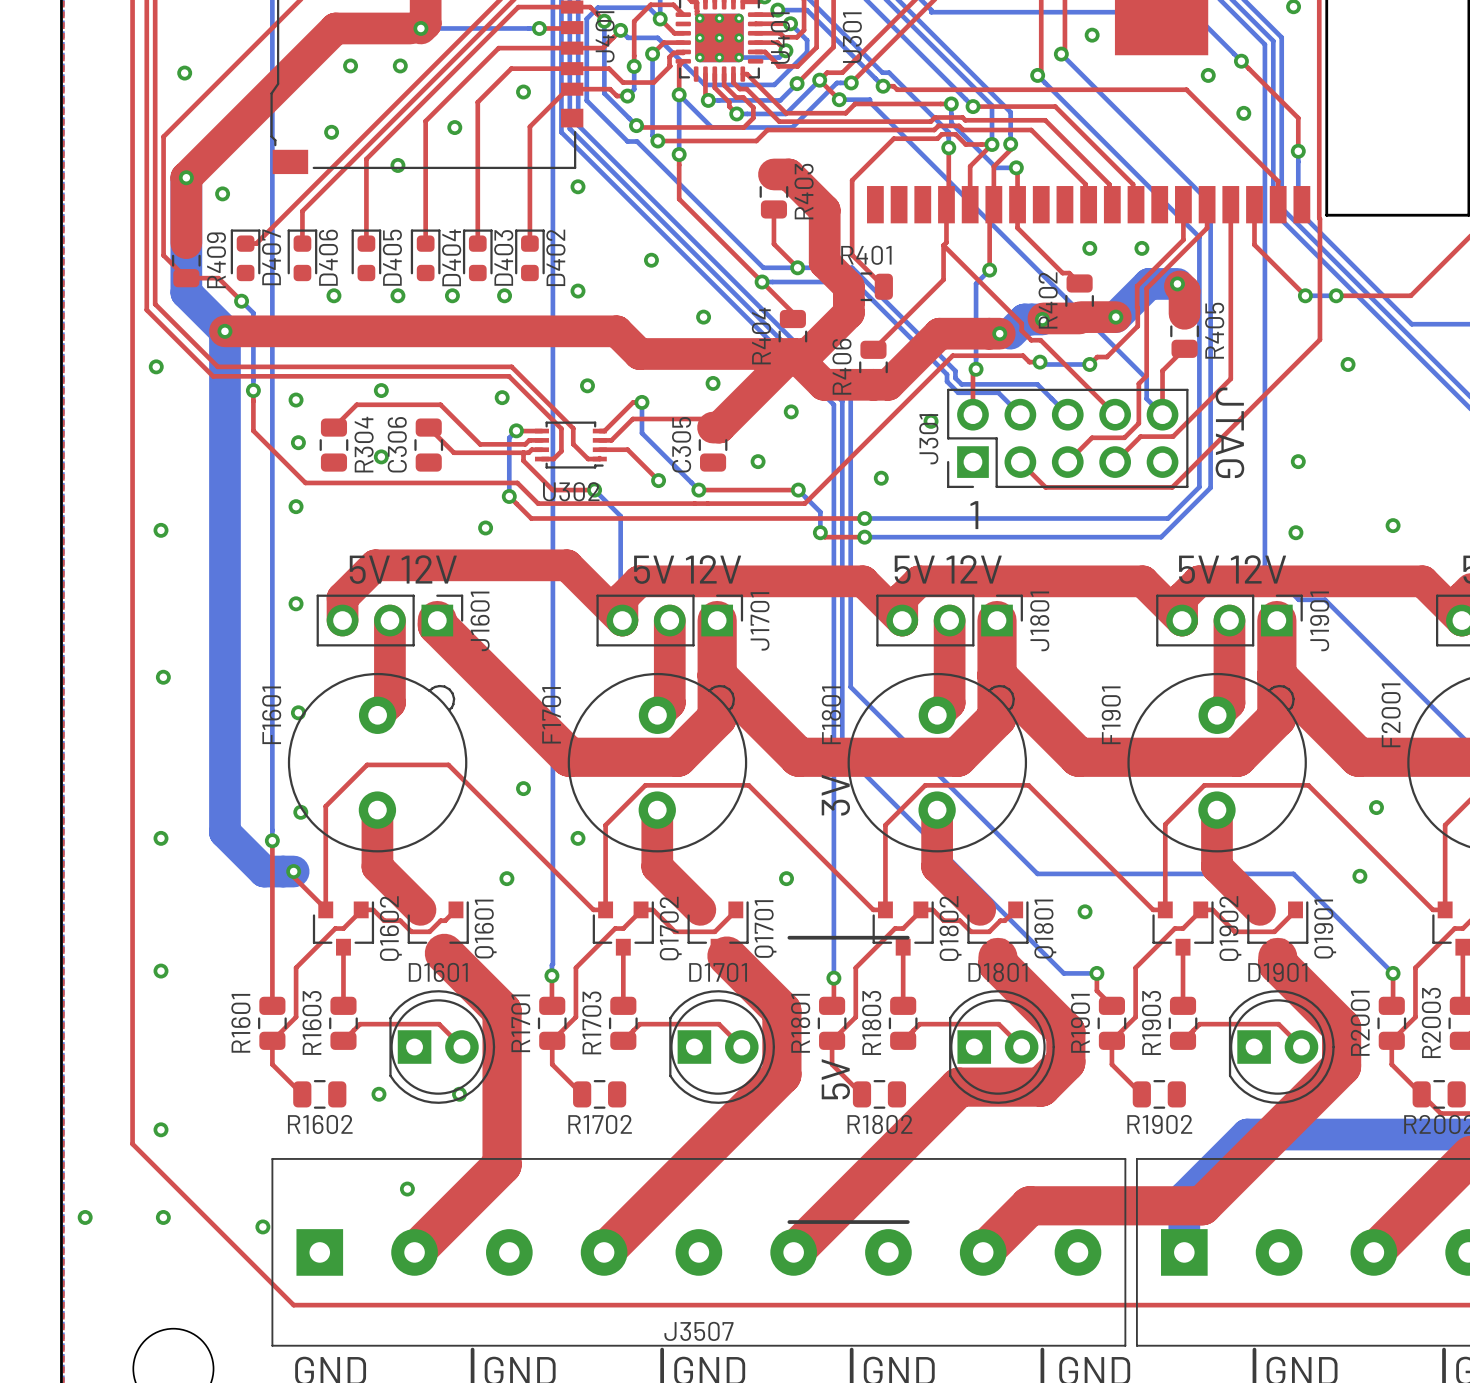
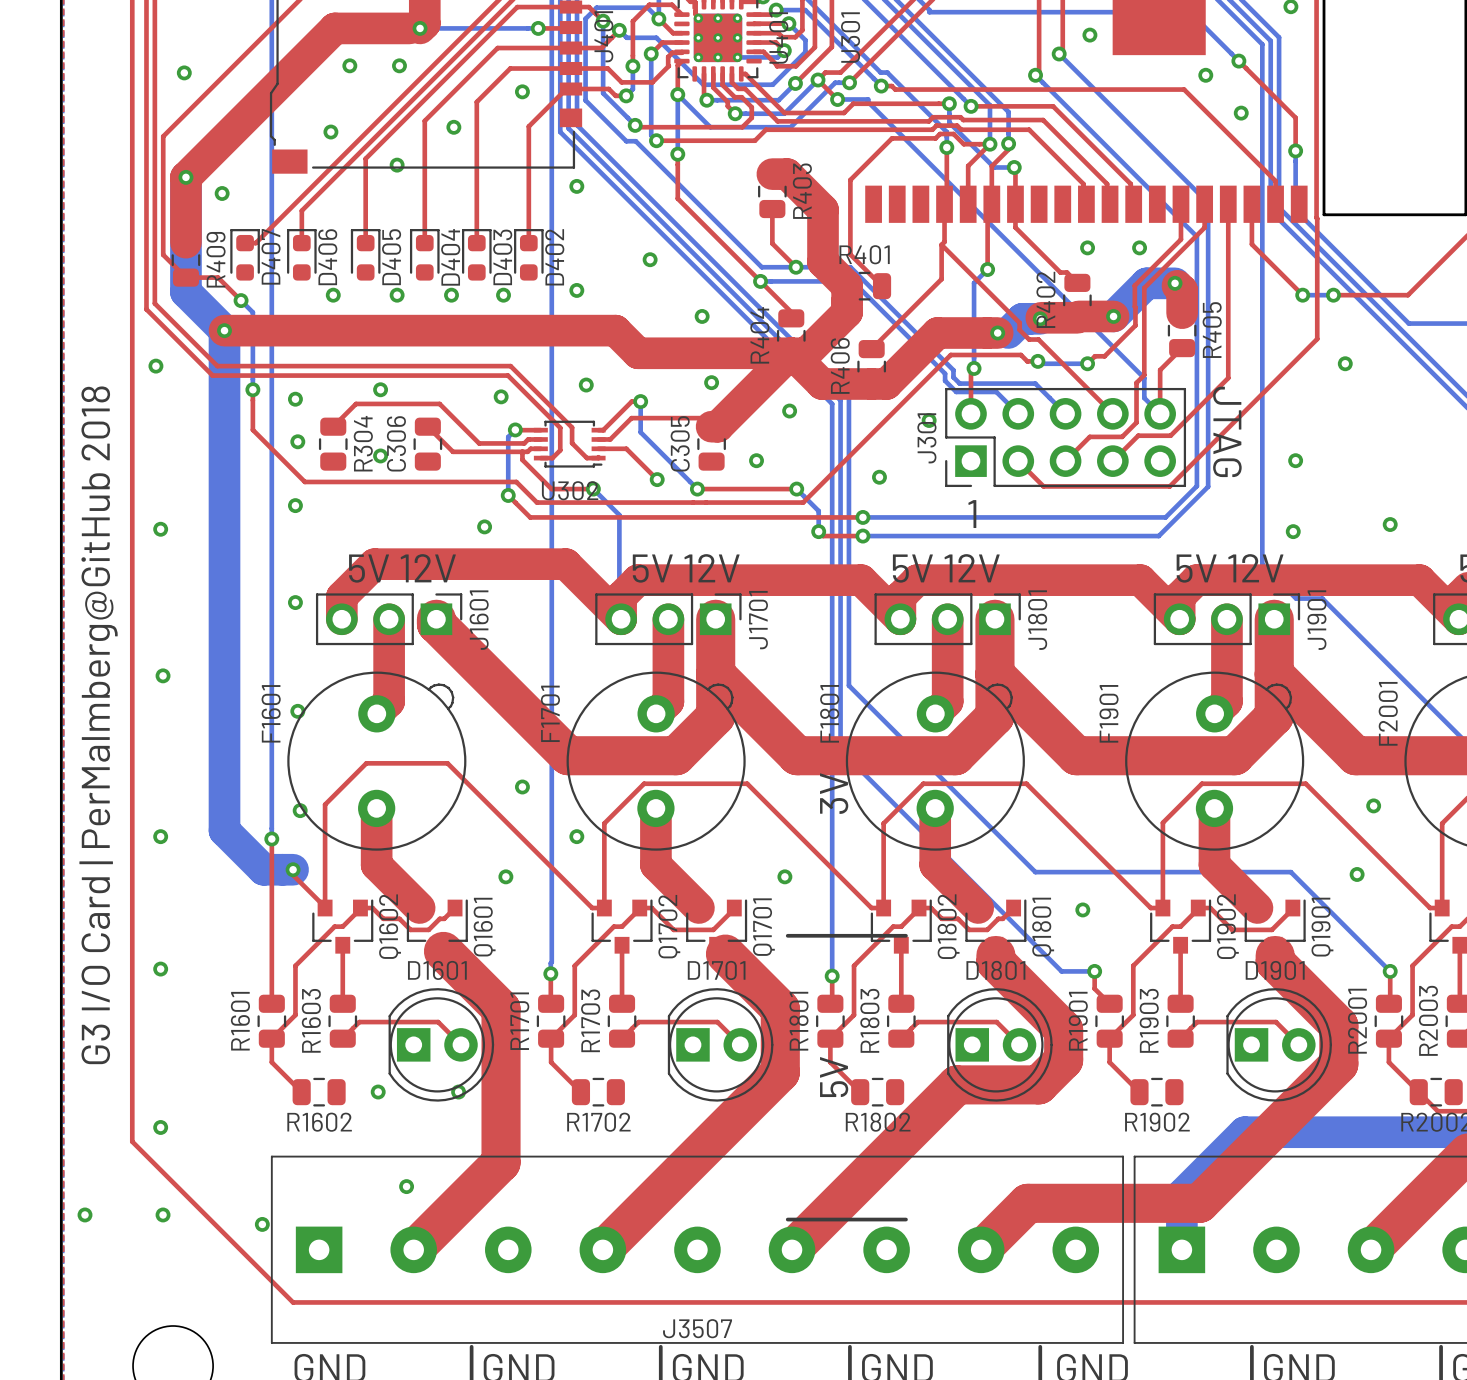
text: none -> G3 I/O Card | PerMalmberg@GitHub 2018 (98, 725)

